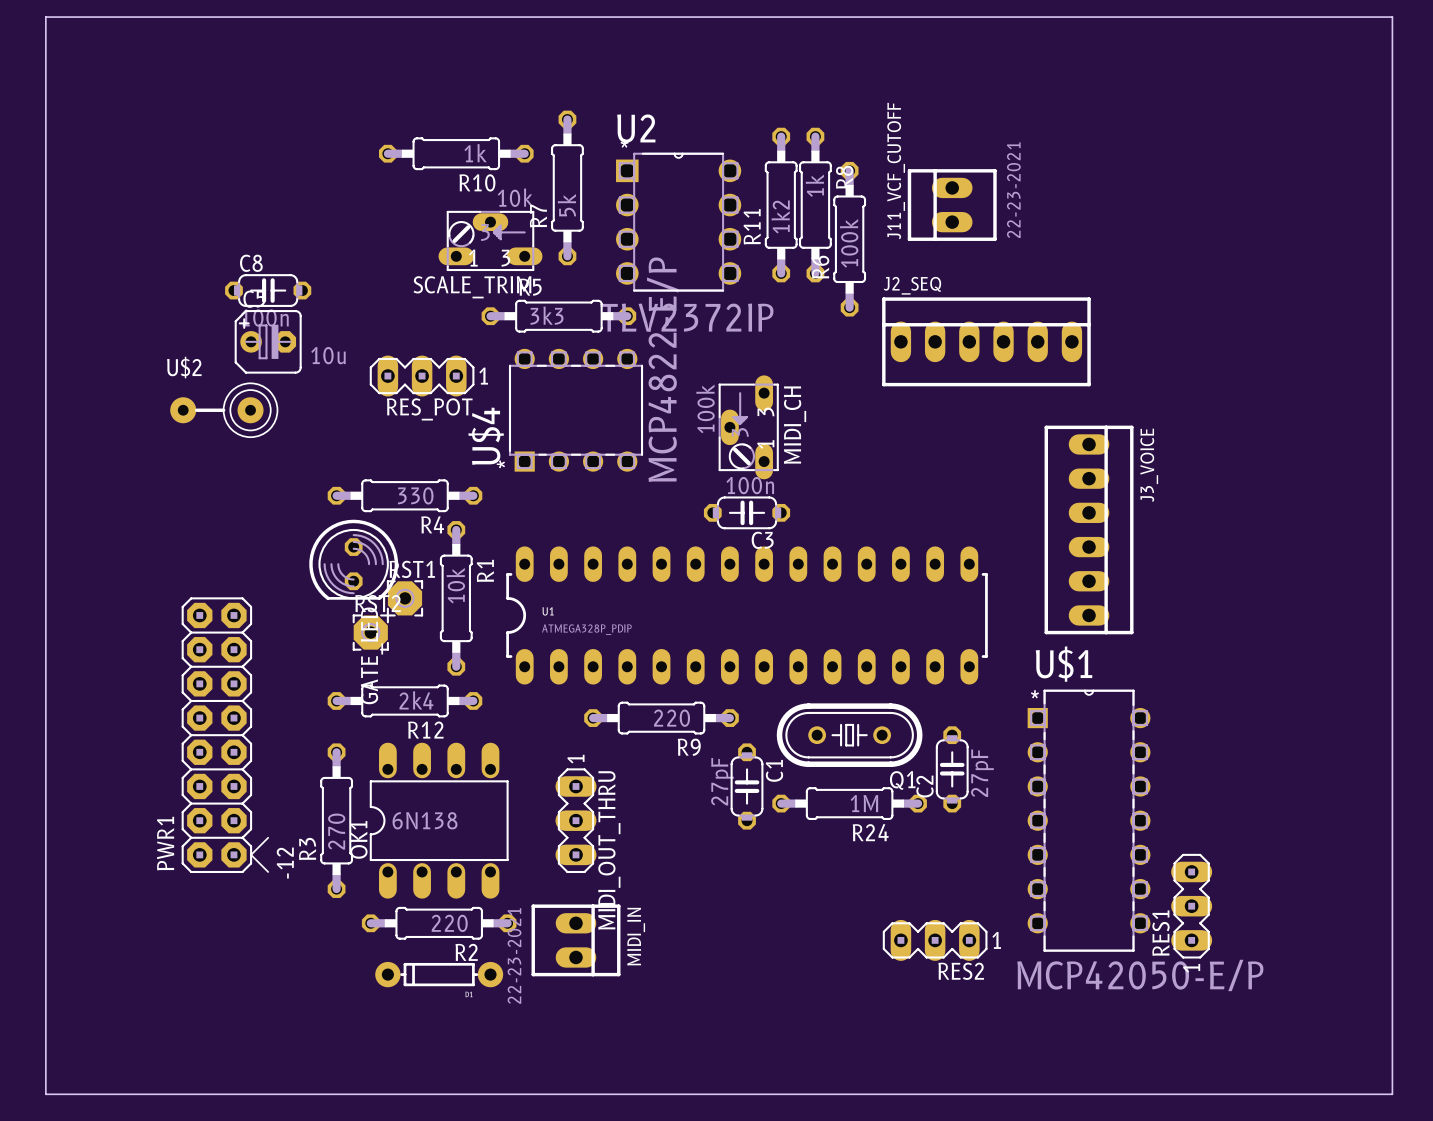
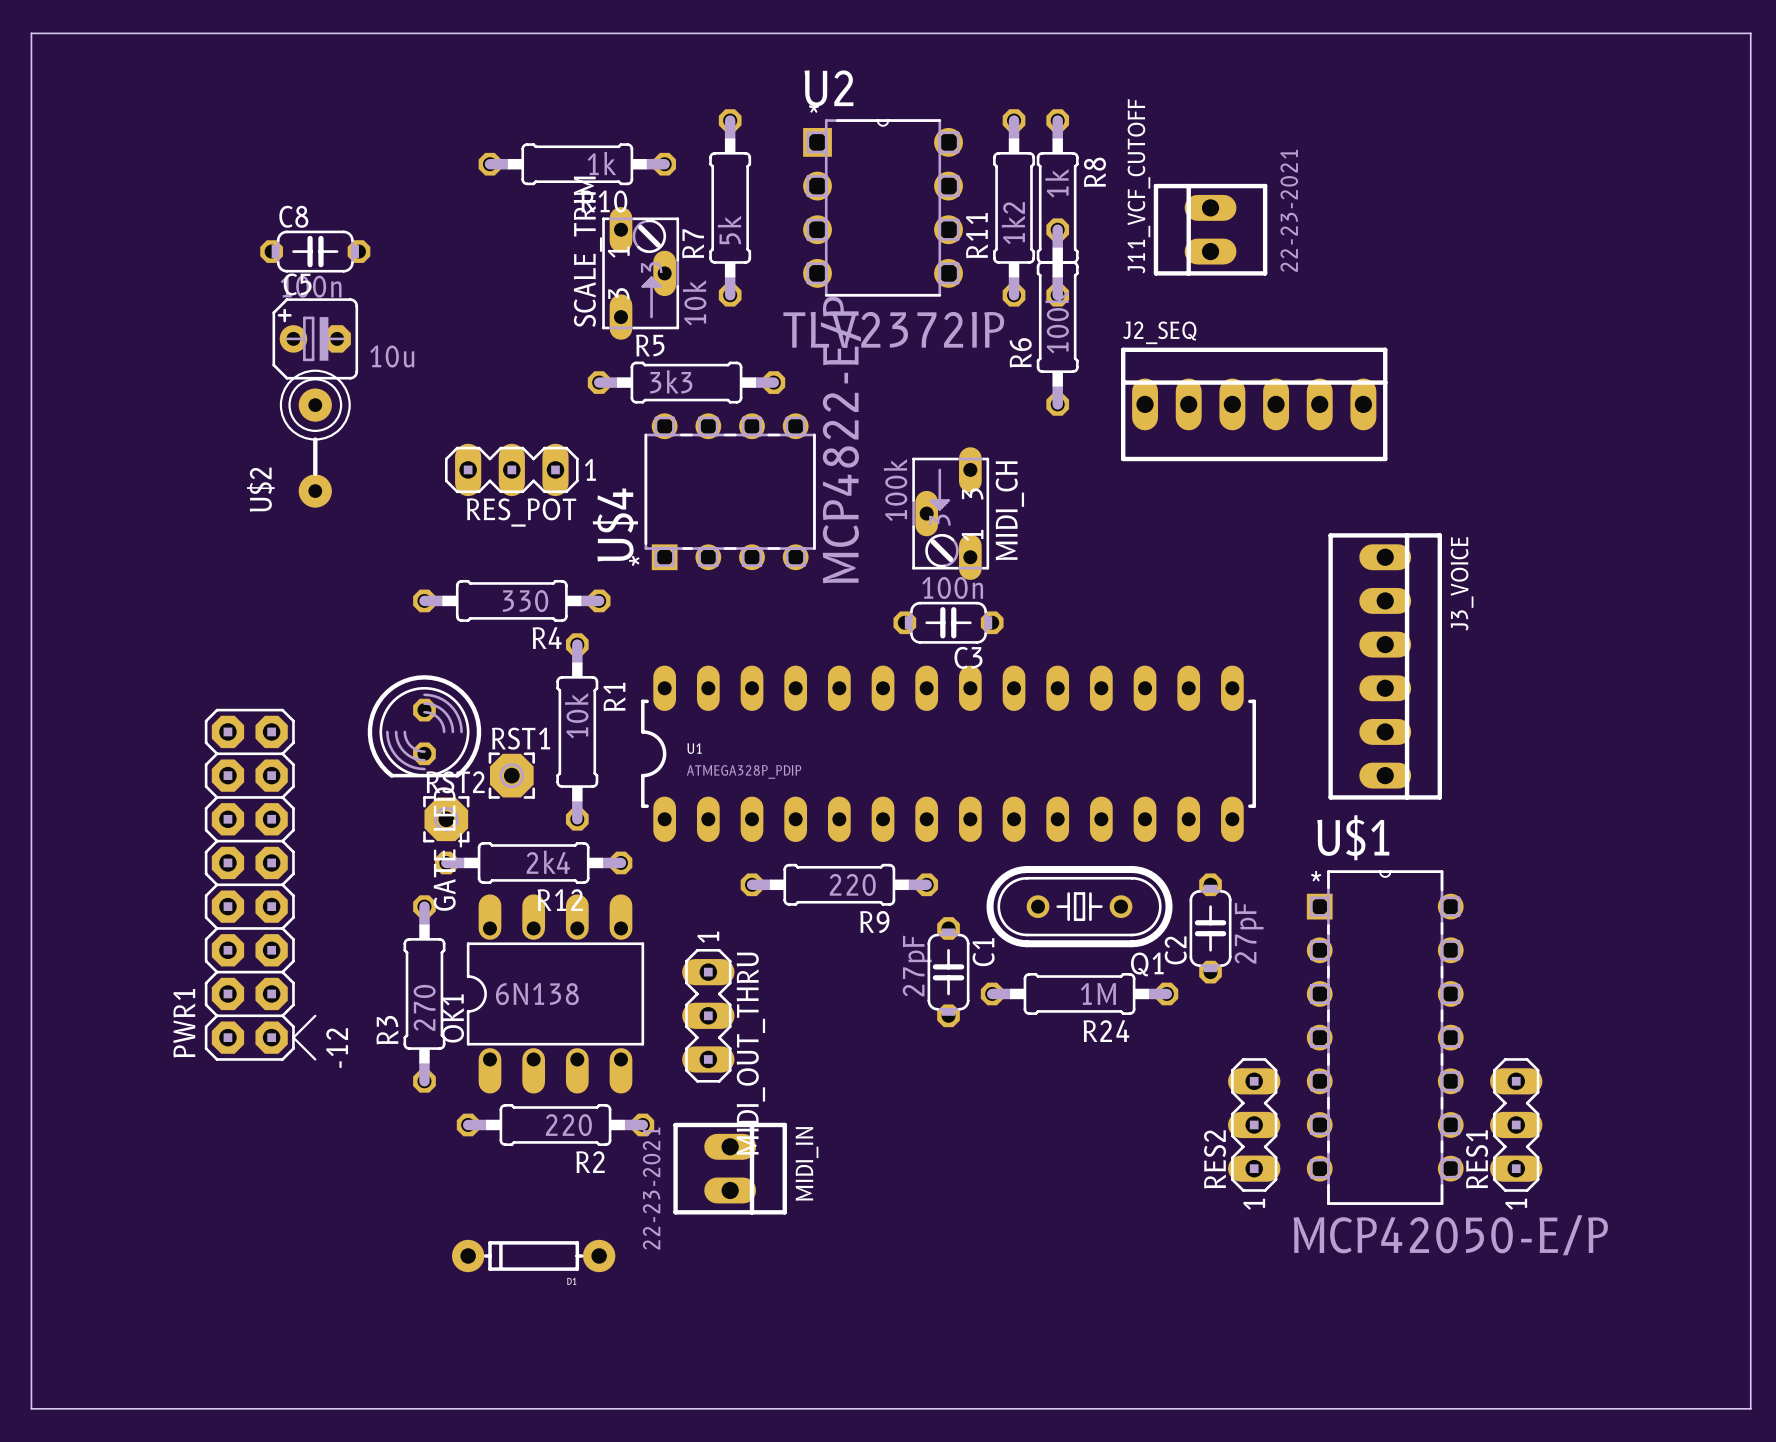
R10 position: (456, 153) -> (577, 164)
R7 position: (567, 187) -> (730, 207)
SCALE_TRIM: none -> 10k (640, 273)
R11 position: (781, 205) -> (1014, 207)
R8 position: (815, 205) -> (1057, 207)
J11_VCF_CUTOFF position: (952, 205) -> (1210, 229)
U2 position: (678, 222) -> (883, 207)
SCALE_TRIM: 10k (490, 240) -> none
C8 position: (268, 290) -> (315, 251)
R5 position: (558, 316) -> (686, 382)
C5 position: (268, 341) -> (315, 338)
J2_SEQ position: (986, 341) -> (1254, 404)
RES_POT position: (422, 376) -> (511, 469)
U$2 rotation: 0° (224, 410) -> 90° counterclockwise (315, 438)
U$2 position: (224, 410) -> (315, 438)
U$4 position: (576, 410) -> (730, 491)
MIDI_CH position: (748, 427) -> (950, 513)
R4 position: (404, 495) -> (511, 600)
C3 position: (747, 512) -> (948, 622)
J3_VOICE position: (1089, 529) -> (1385, 666)
RST1 position: (404, 598) -> (511, 775)
R1 position: (456, 598) -> (577, 731)
U1 position: (747, 615) -> (948, 753)
R12 position: (404, 700) -> (533, 862)
R9 position: (661, 718) -> (839, 884)
PWR1 position: (225, 735) -> (260, 884)
Q1 position: (849, 735) -> (1079, 906)
C2 position: (952, 769) -> (1210, 928)
C1 position: (747, 786) -> (948, 972)
R24 position: (849, 803) -> (1079, 993)
R3 position: (336, 820) -> (424, 993)
OK1 position: (439, 820) -> (555, 993)
MIDI_OUT_THRU position: (576, 820) -> (708, 1015)
U$1 position: (1089, 820) -> (1385, 1037)
RES1 position: (1191, 906) -> (1516, 1124)
RES2 footprint: [882, 919, 988, 961] -> [1228, 1058, 1281, 1192]
R2 position: (439, 923) -> (555, 1124)
MIDI_IN position: (576, 940) -> (730, 1168)
RES2 name position: RES2 (961, 971) -> RES2 (1215, 1159)

